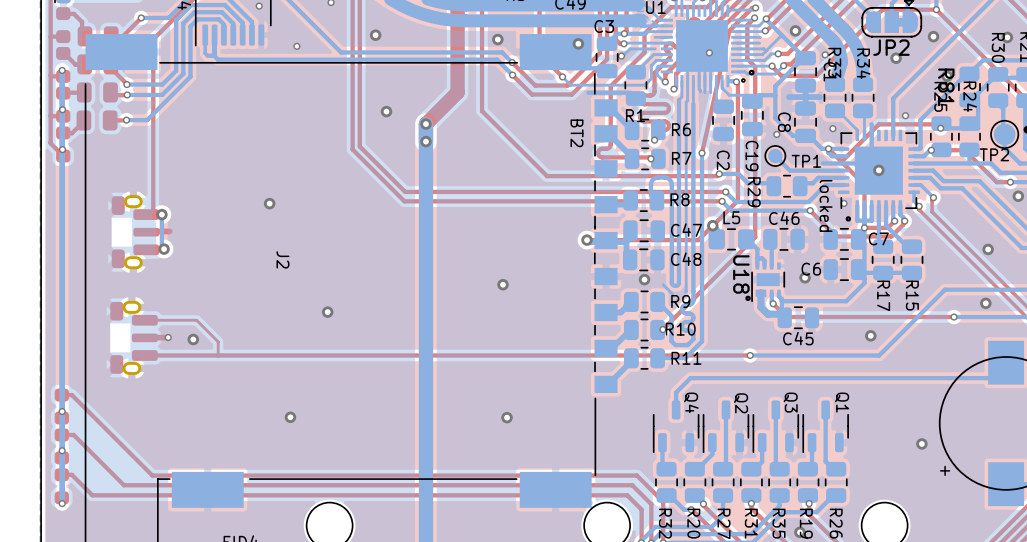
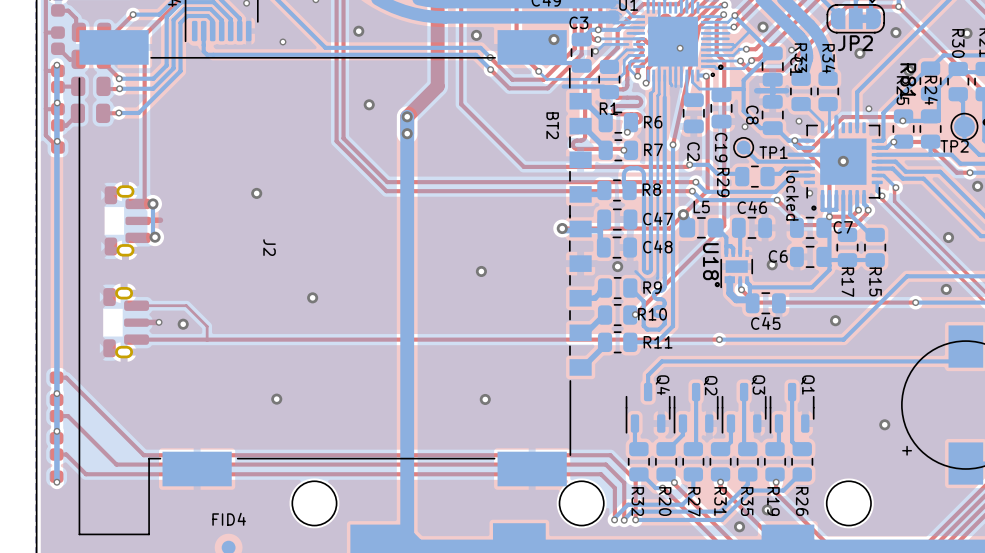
bottom track: (205, 35) (205, 53) (207, 55) (214, 53) -> none

